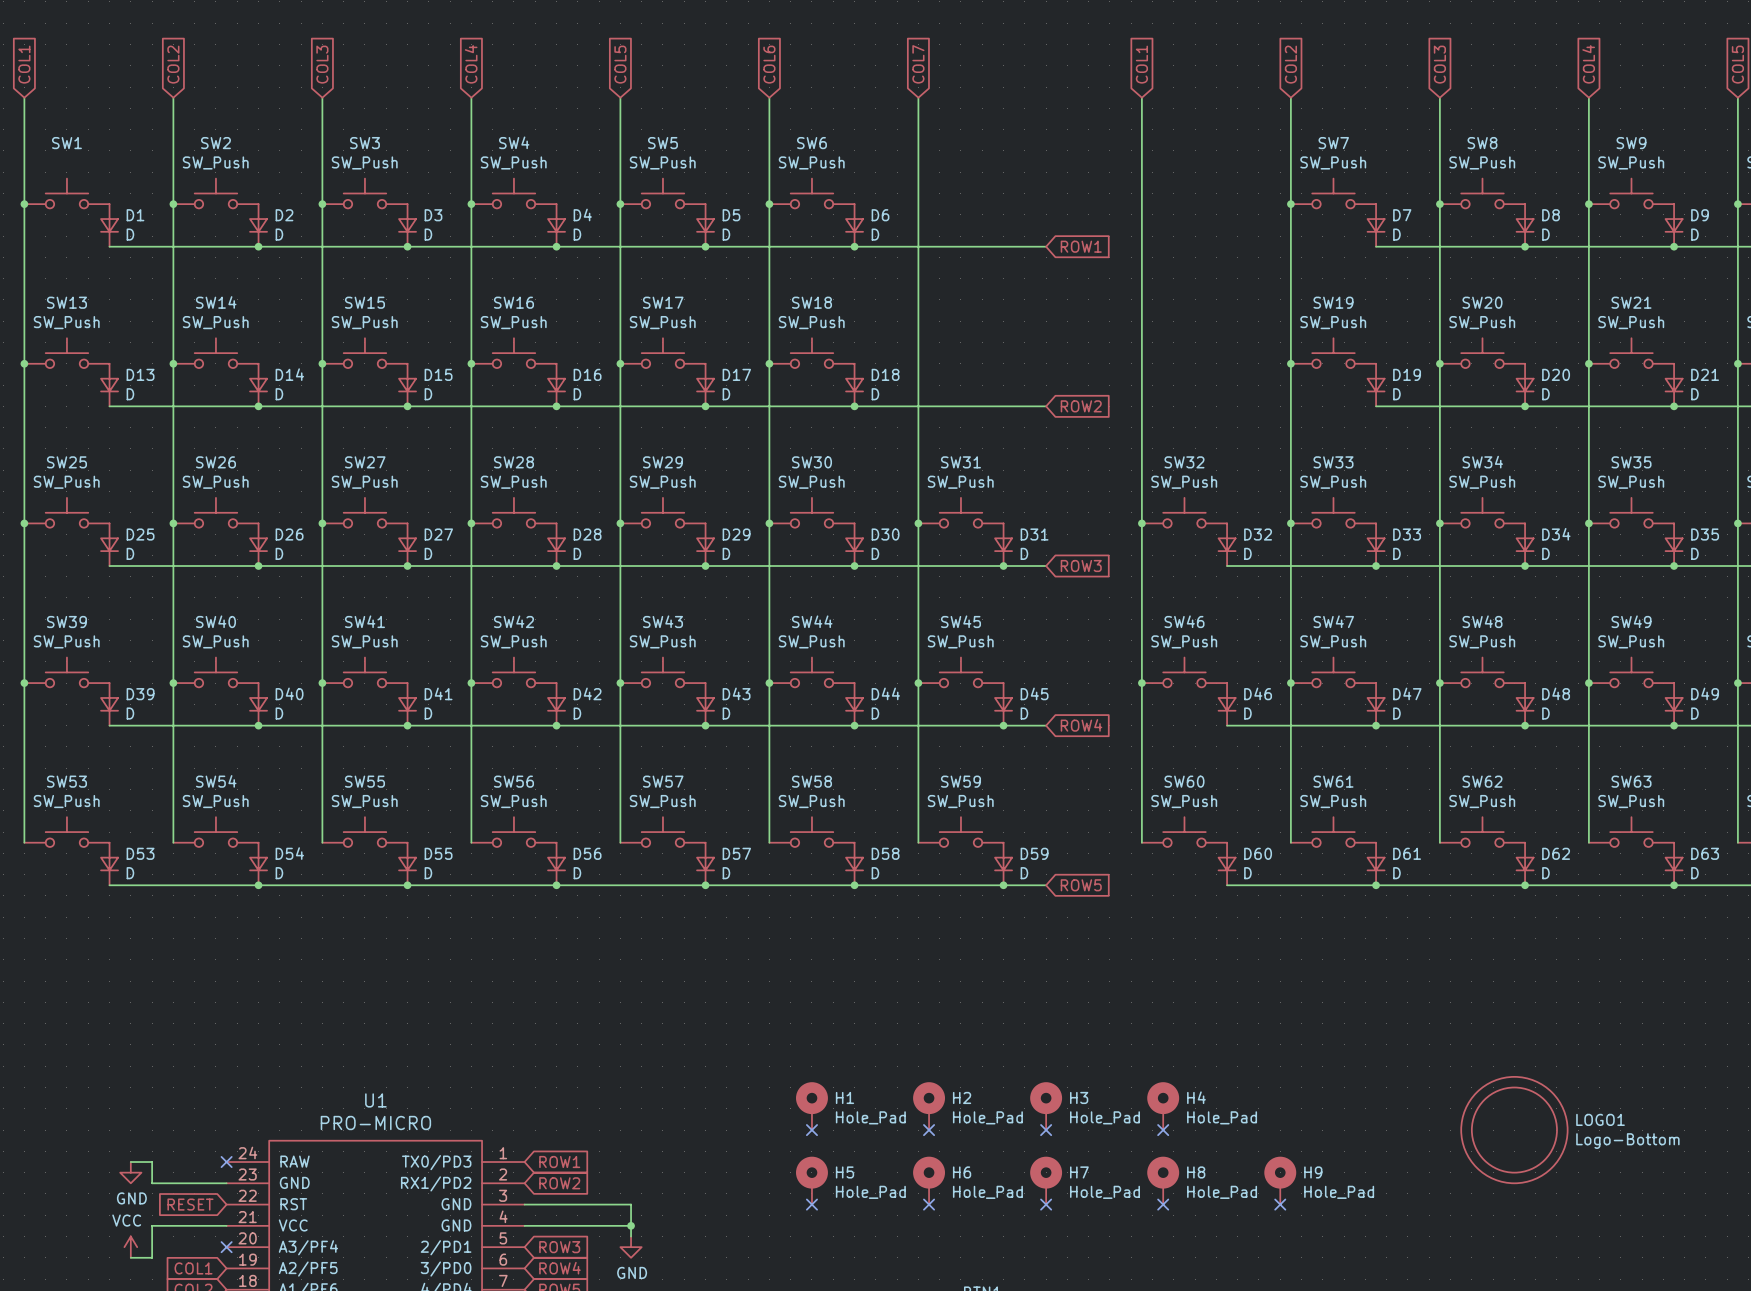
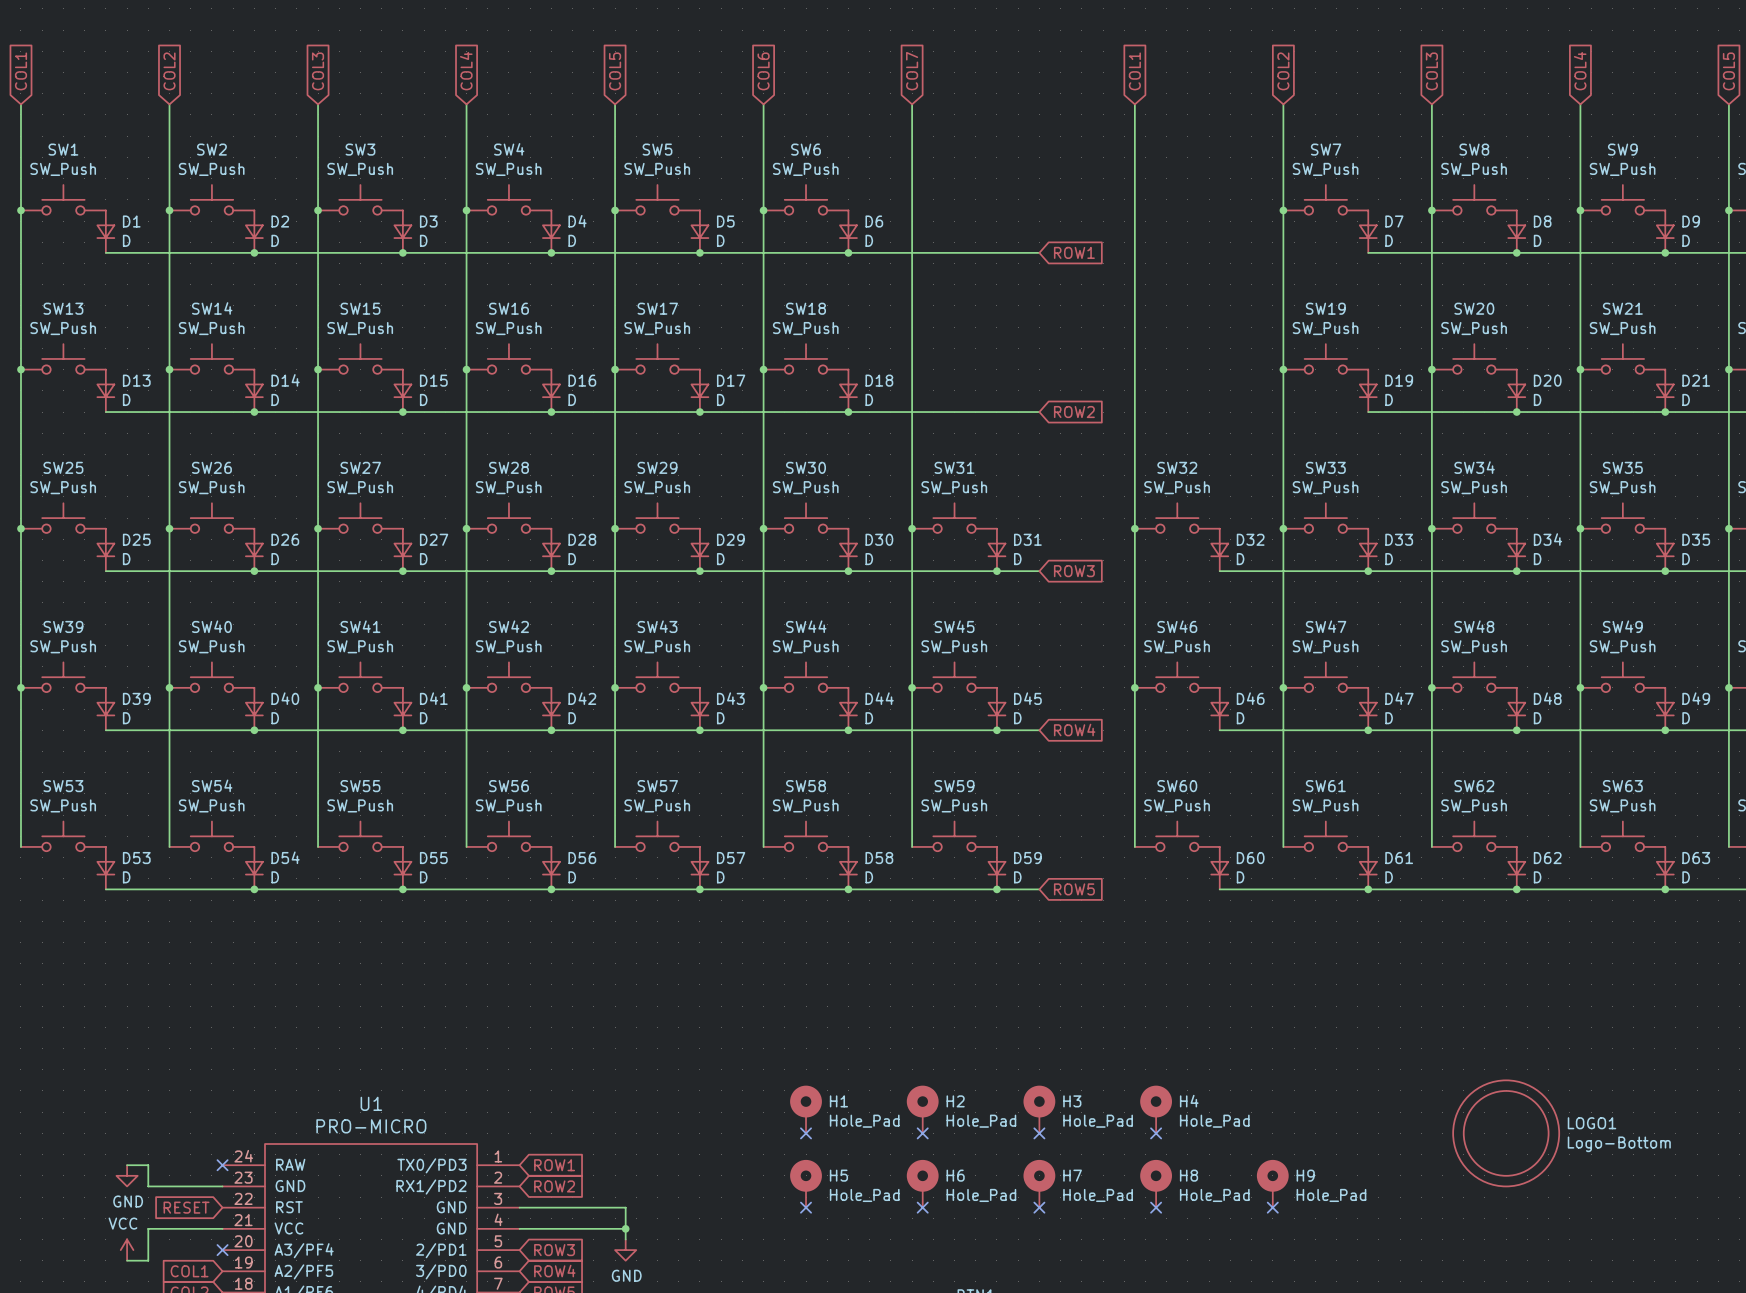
SW1 value: none -> SW_Push (63, 169)

